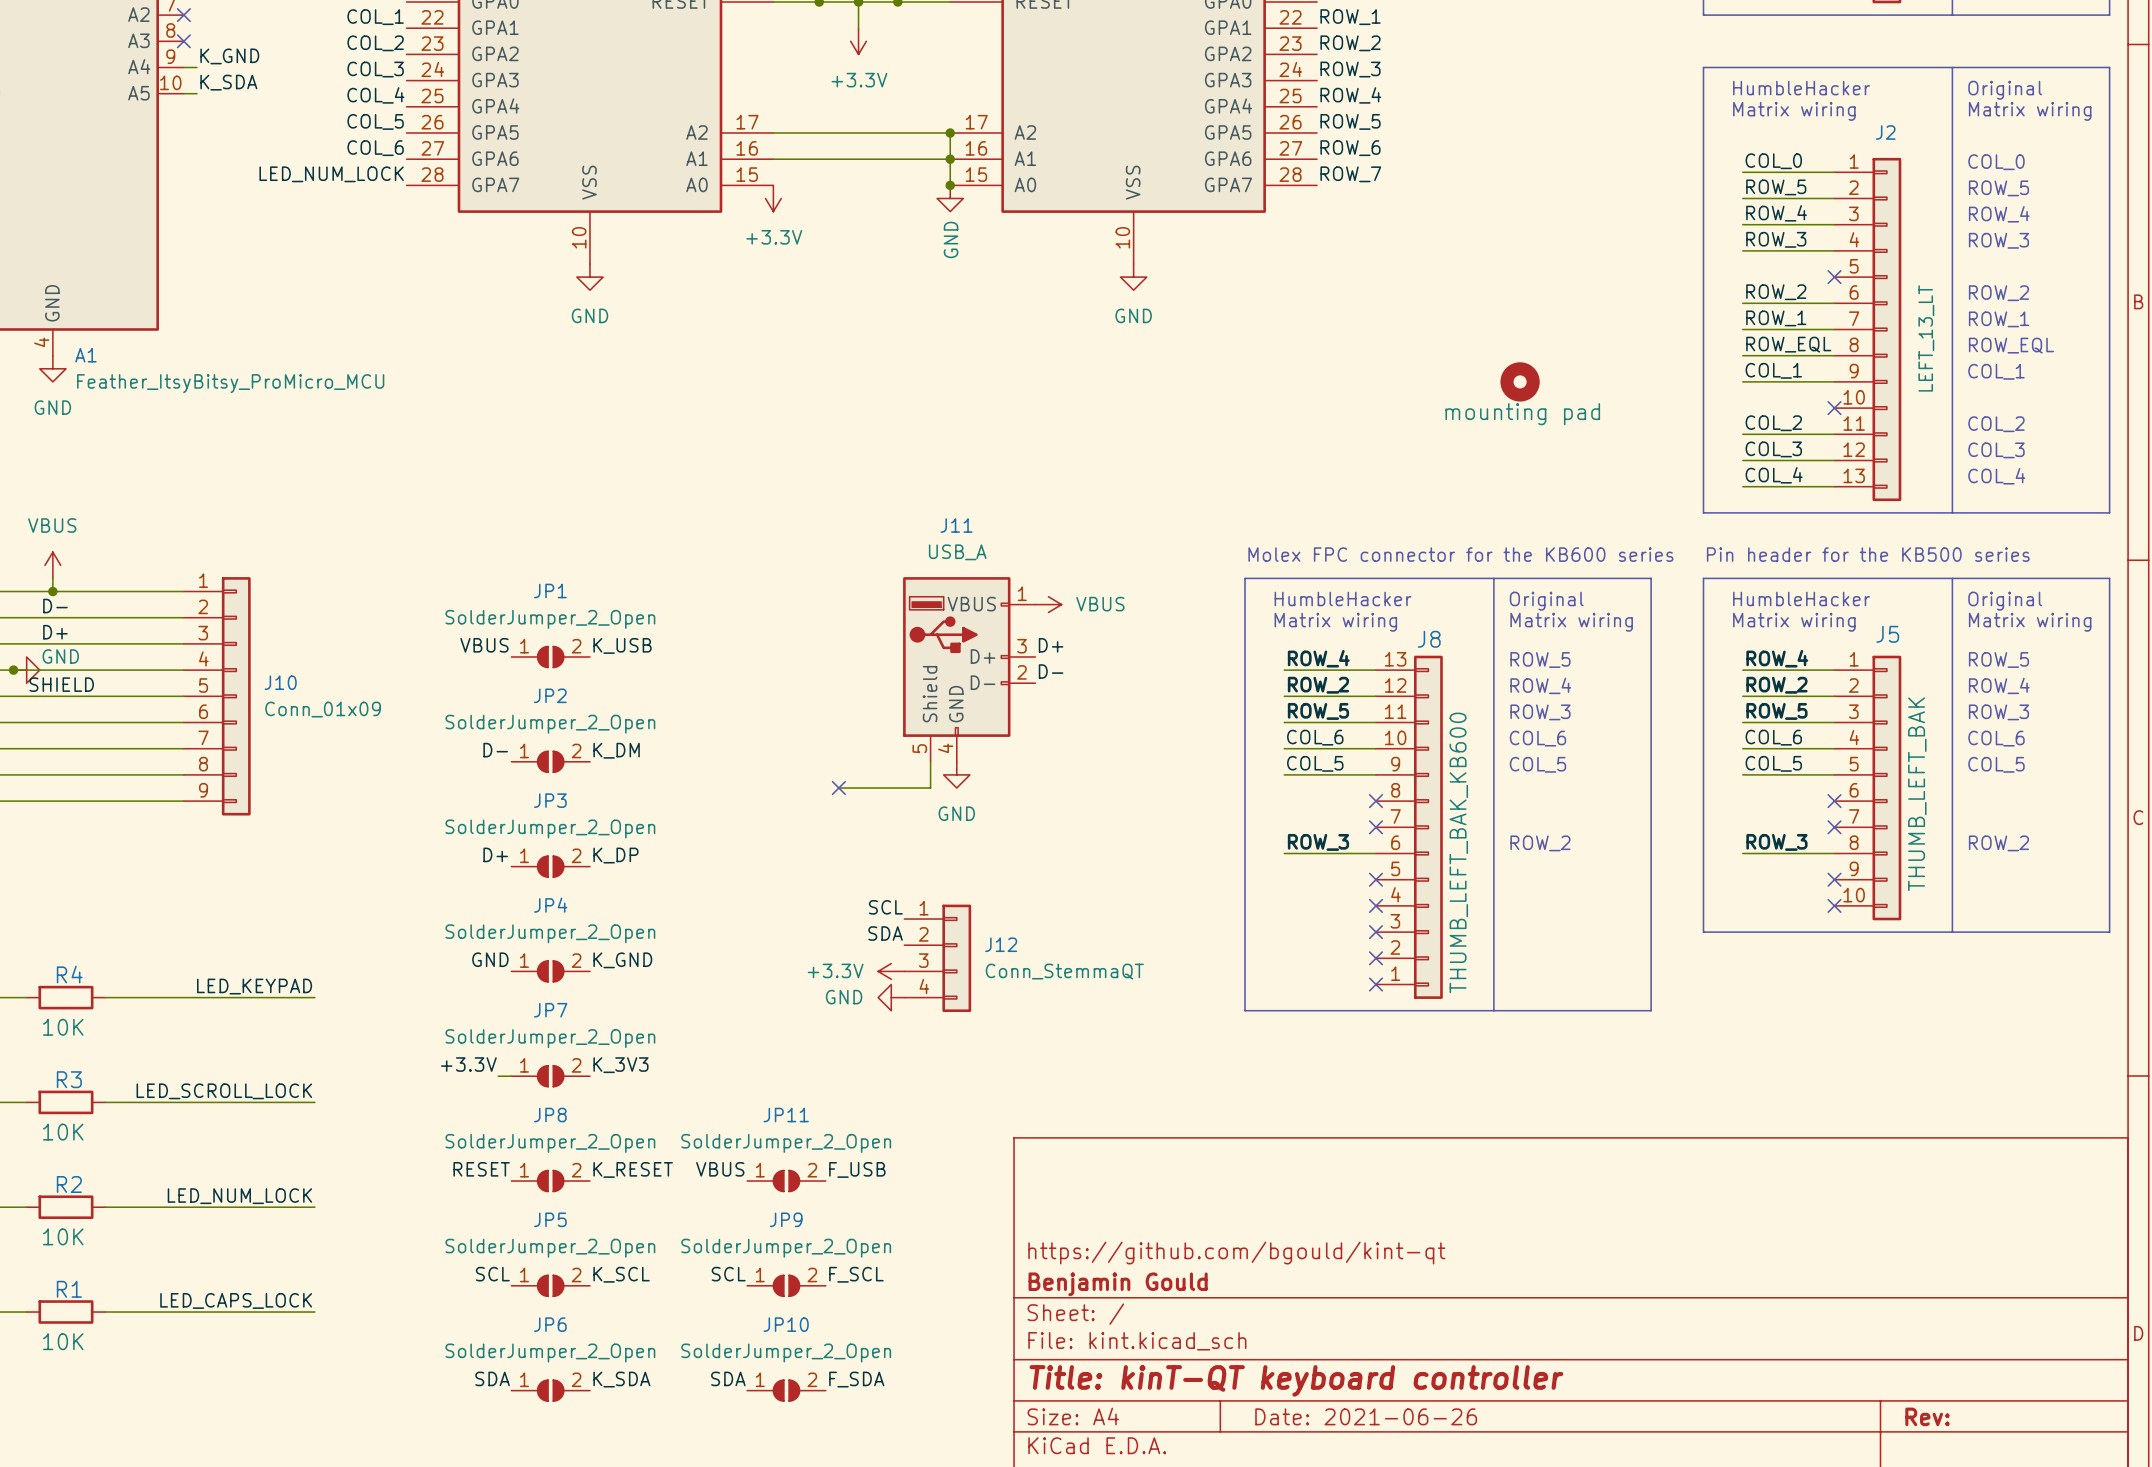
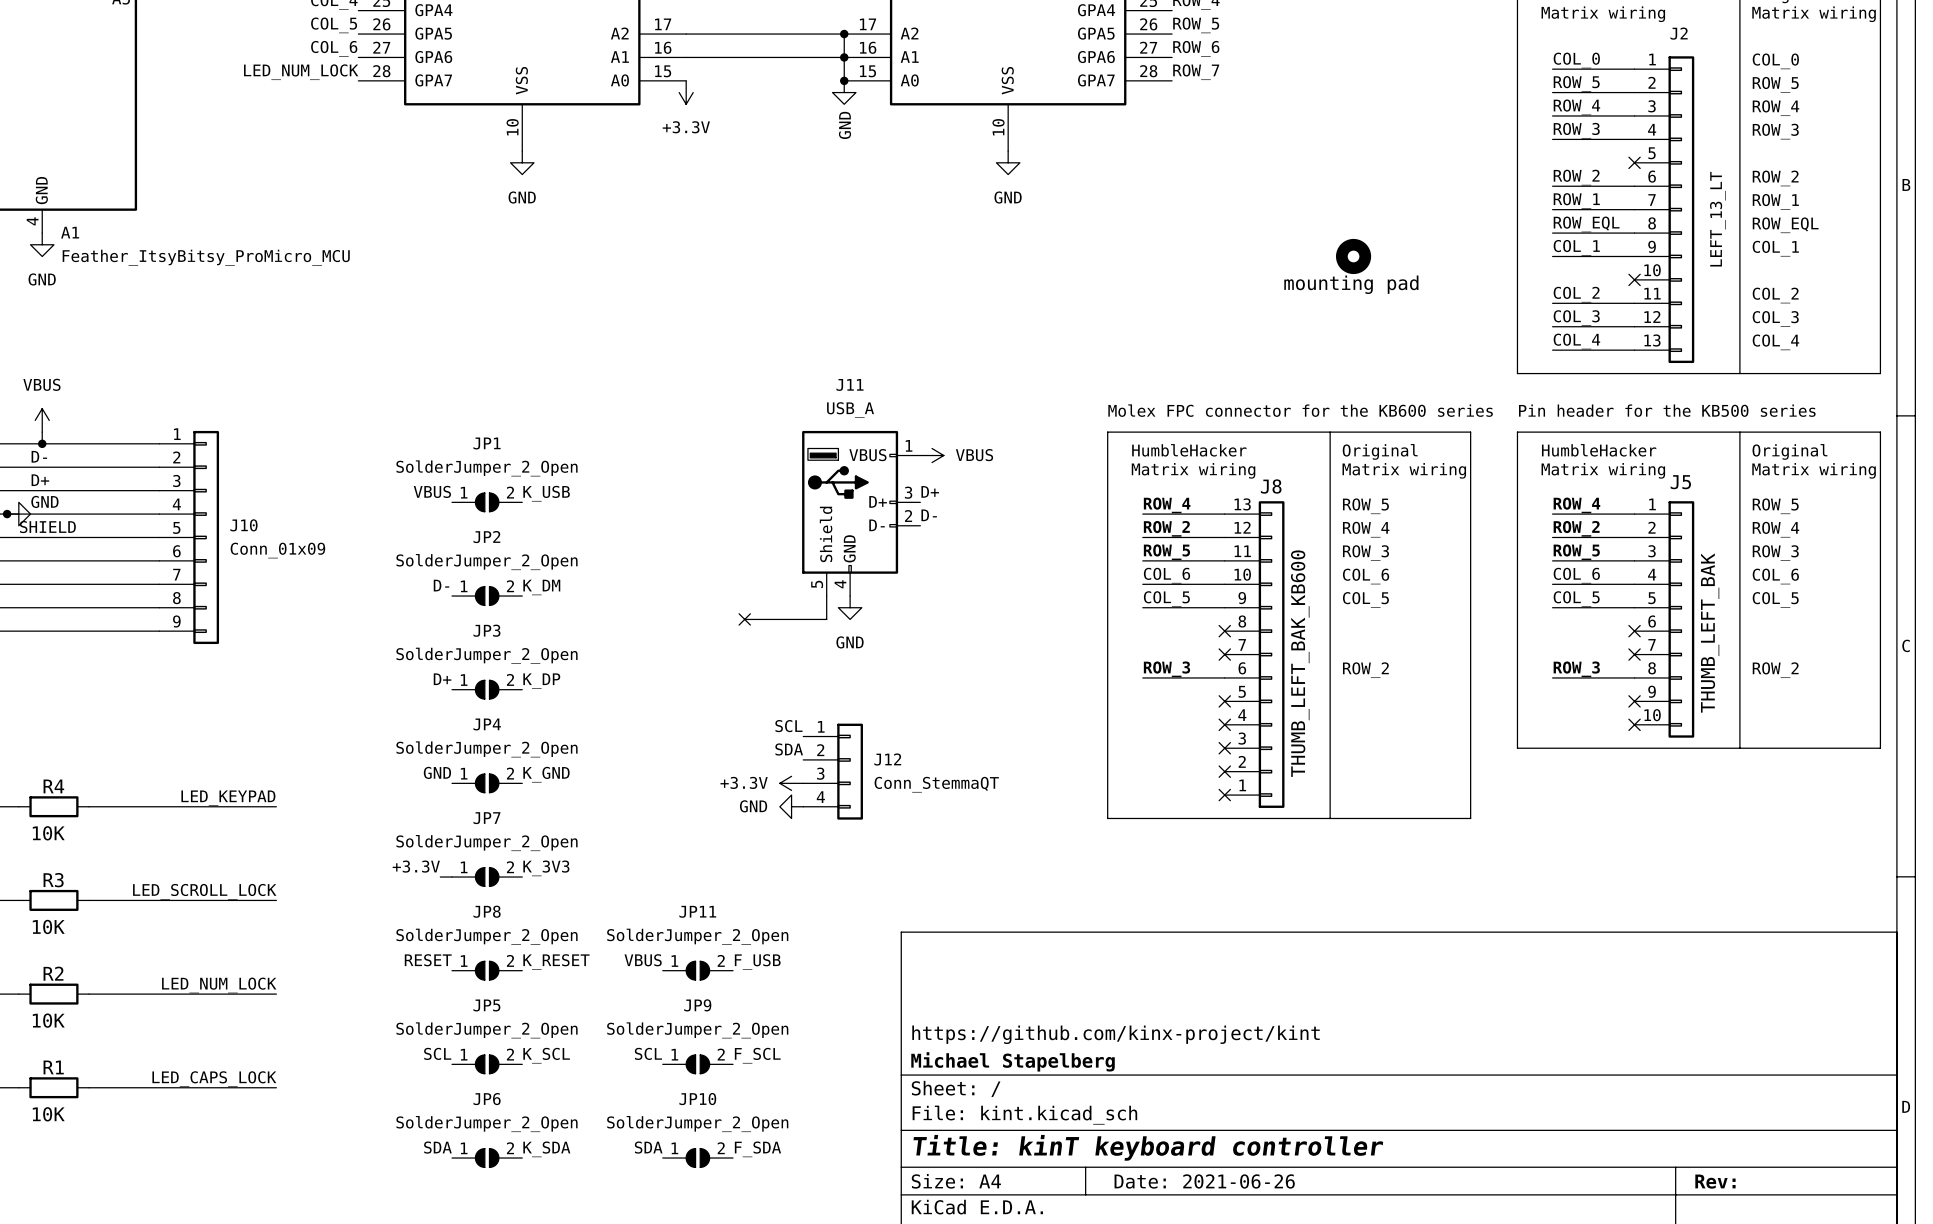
title block: https://github.com/bgould/kint-qt (1236, 1252) -> https://github.com/kinx-project/kint (1116, 1034)
title block: Benjamin Gould (1118, 1284) -> Michael Stapelberg (1013, 1061)
title block: Title: kinT-QT keyboard controller (1296, 1380) -> Title: kinT keyboard controller (1148, 1147)

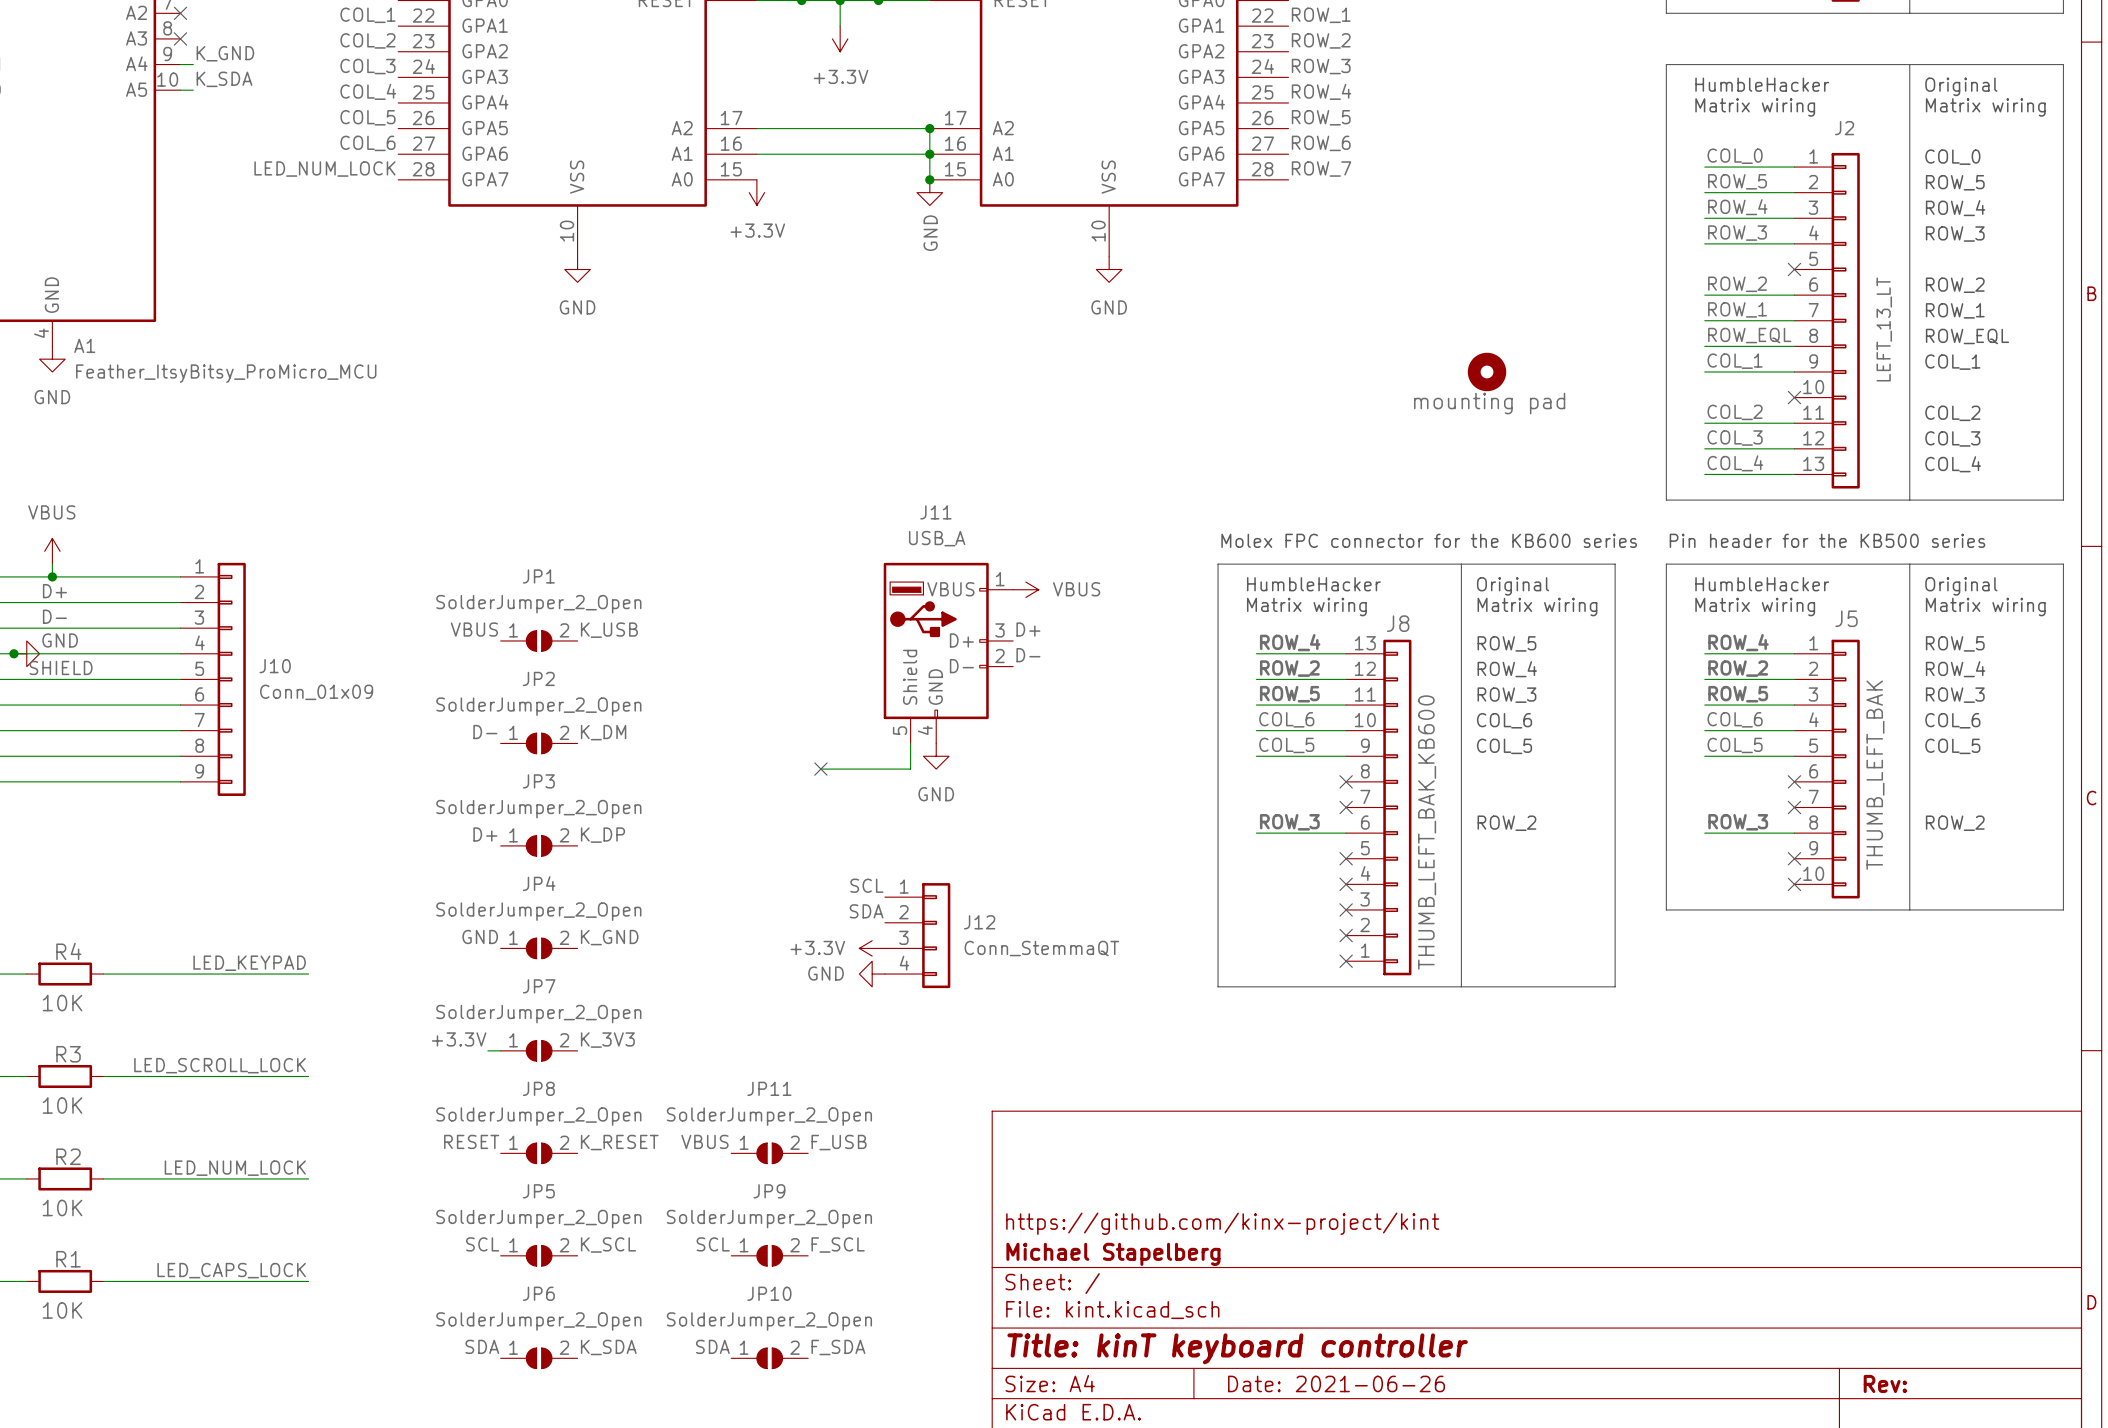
label: D- (39, 456) -> D+ (54, 591)
label: D+ (40, 480) -> D- (54, 616)

